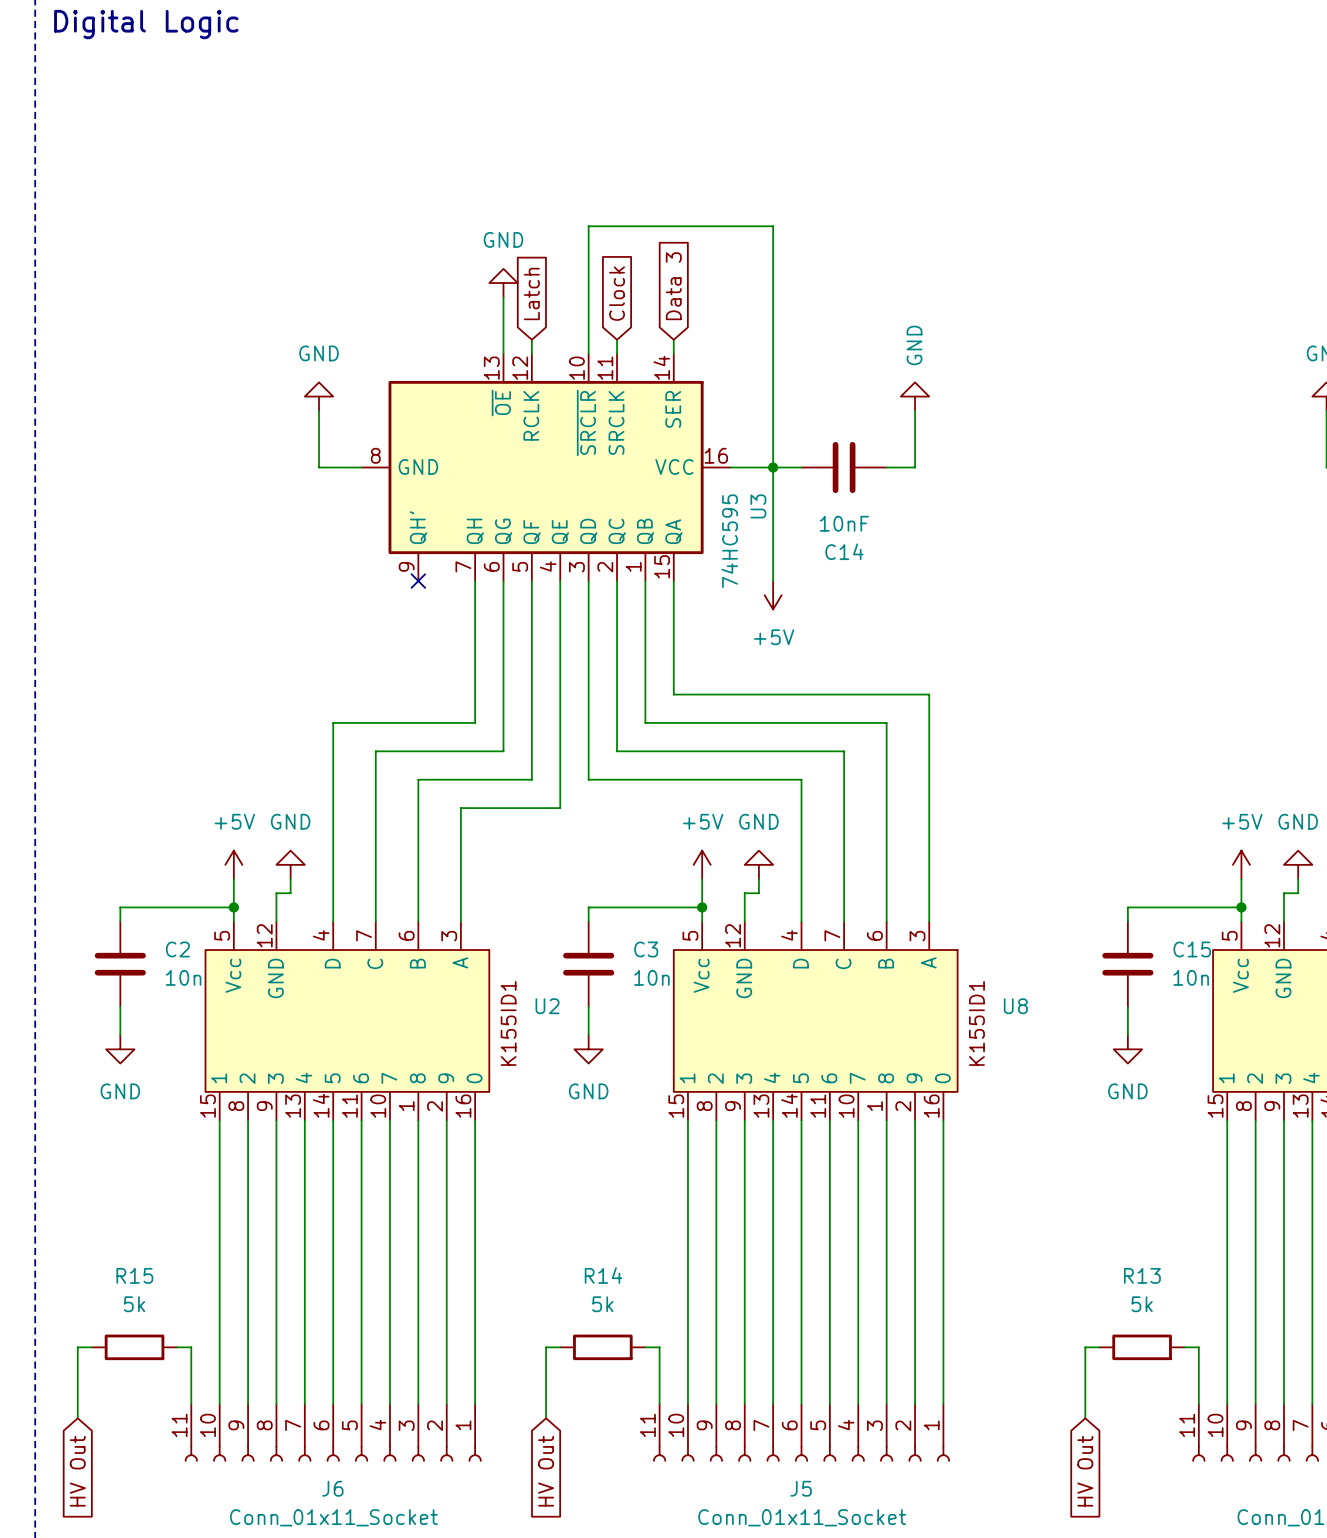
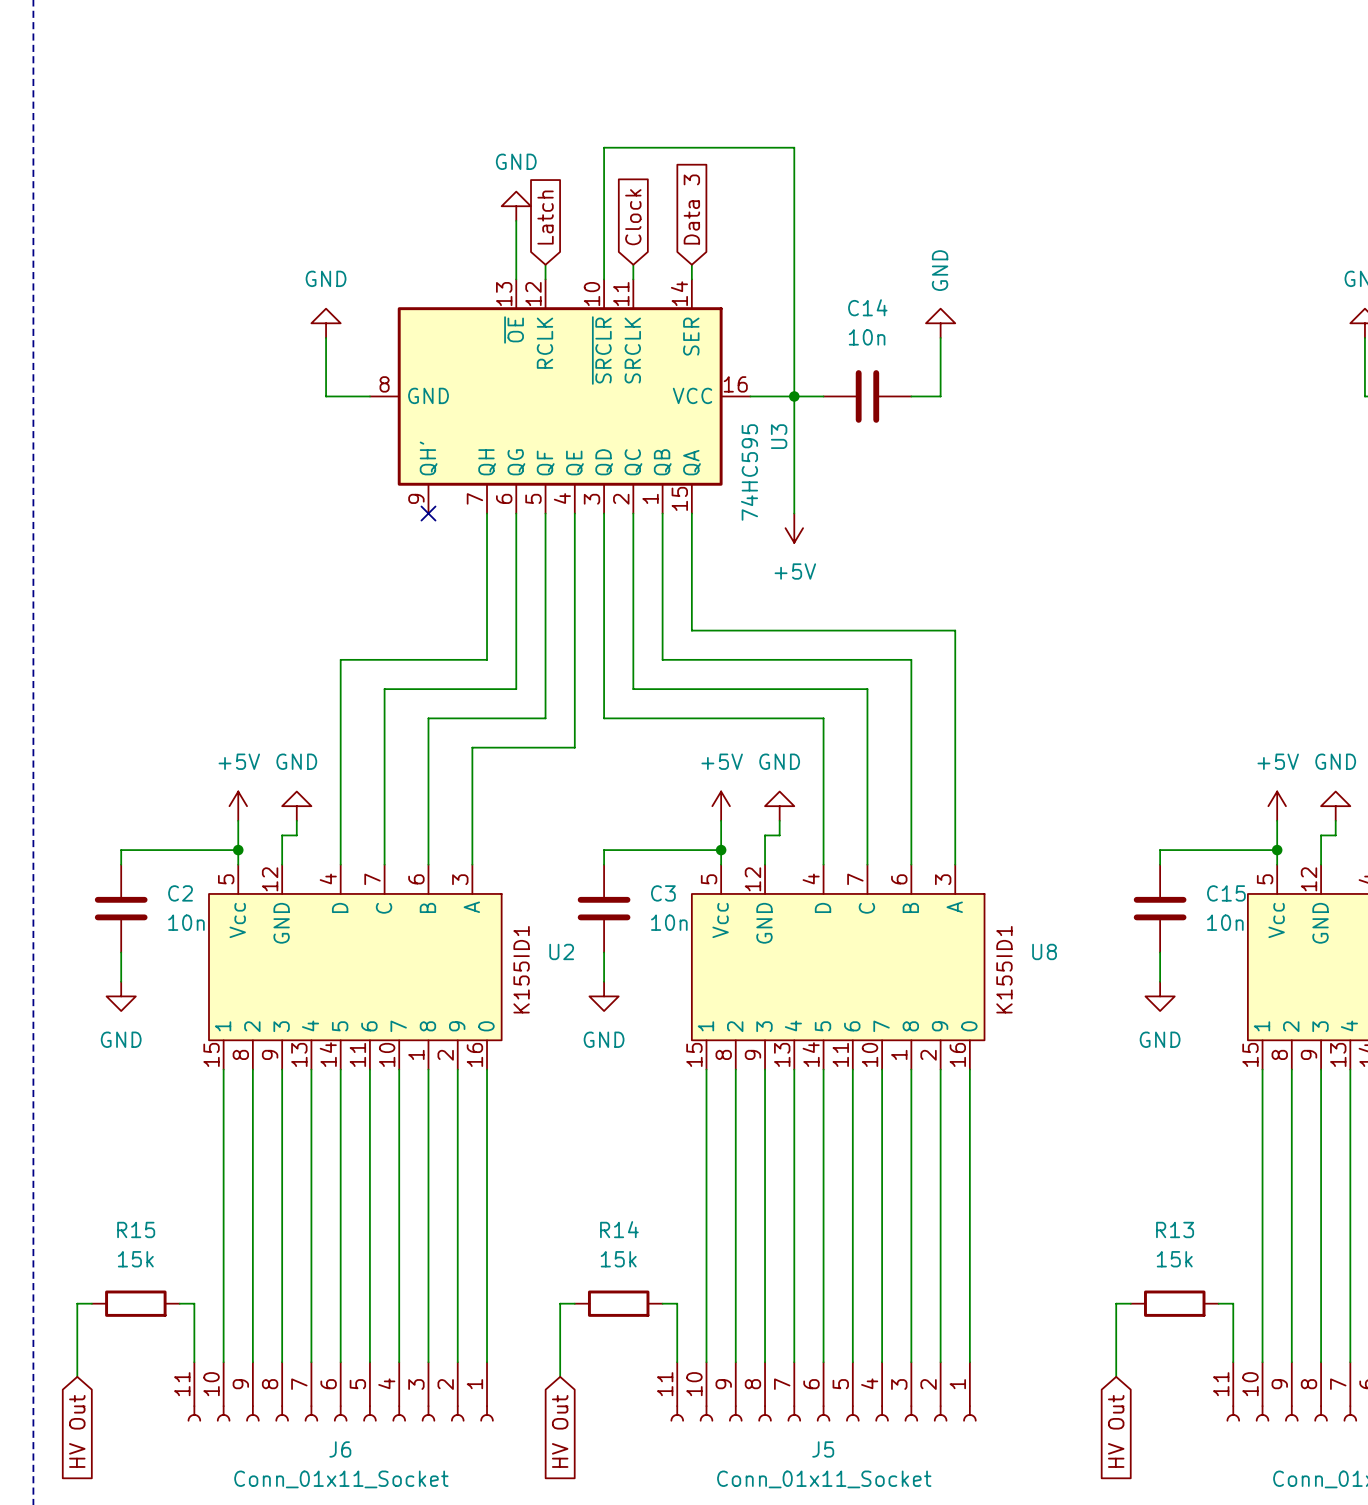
C14 value: 10nF (844, 523) -> 10n (867, 337)
C14 name position: C14 (844, 551) -> C14 (867, 307)
R15 value: 5k (134, 1304) -> 15k (135, 1259)
R14 value: 5k (602, 1304) -> 15k (618, 1259)
R13 value: 5k (1142, 1304) -> 15k (1174, 1259)

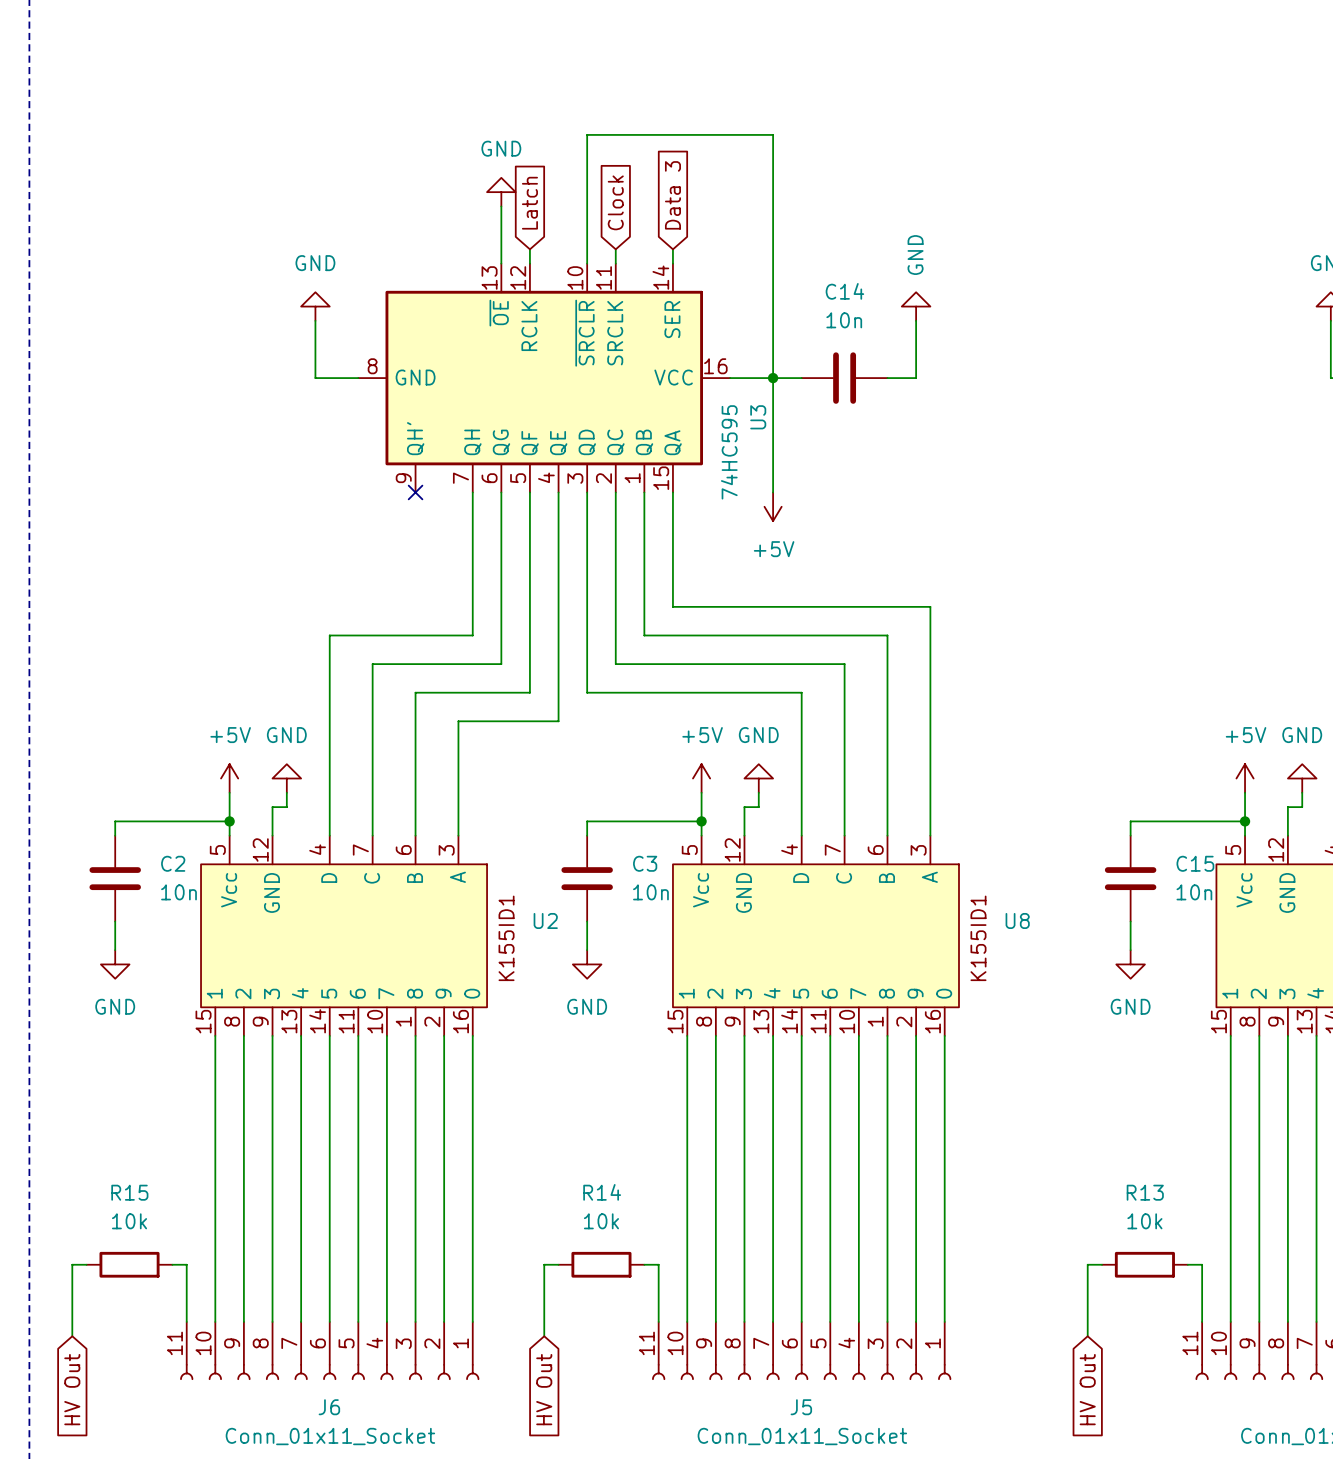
R15 value: 15k (135, 1259) -> 10k (129, 1221)
R14 value: 15k (618, 1259) -> 10k (601, 1221)
R13 value: 15k (1174, 1259) -> 10k (1144, 1221)

